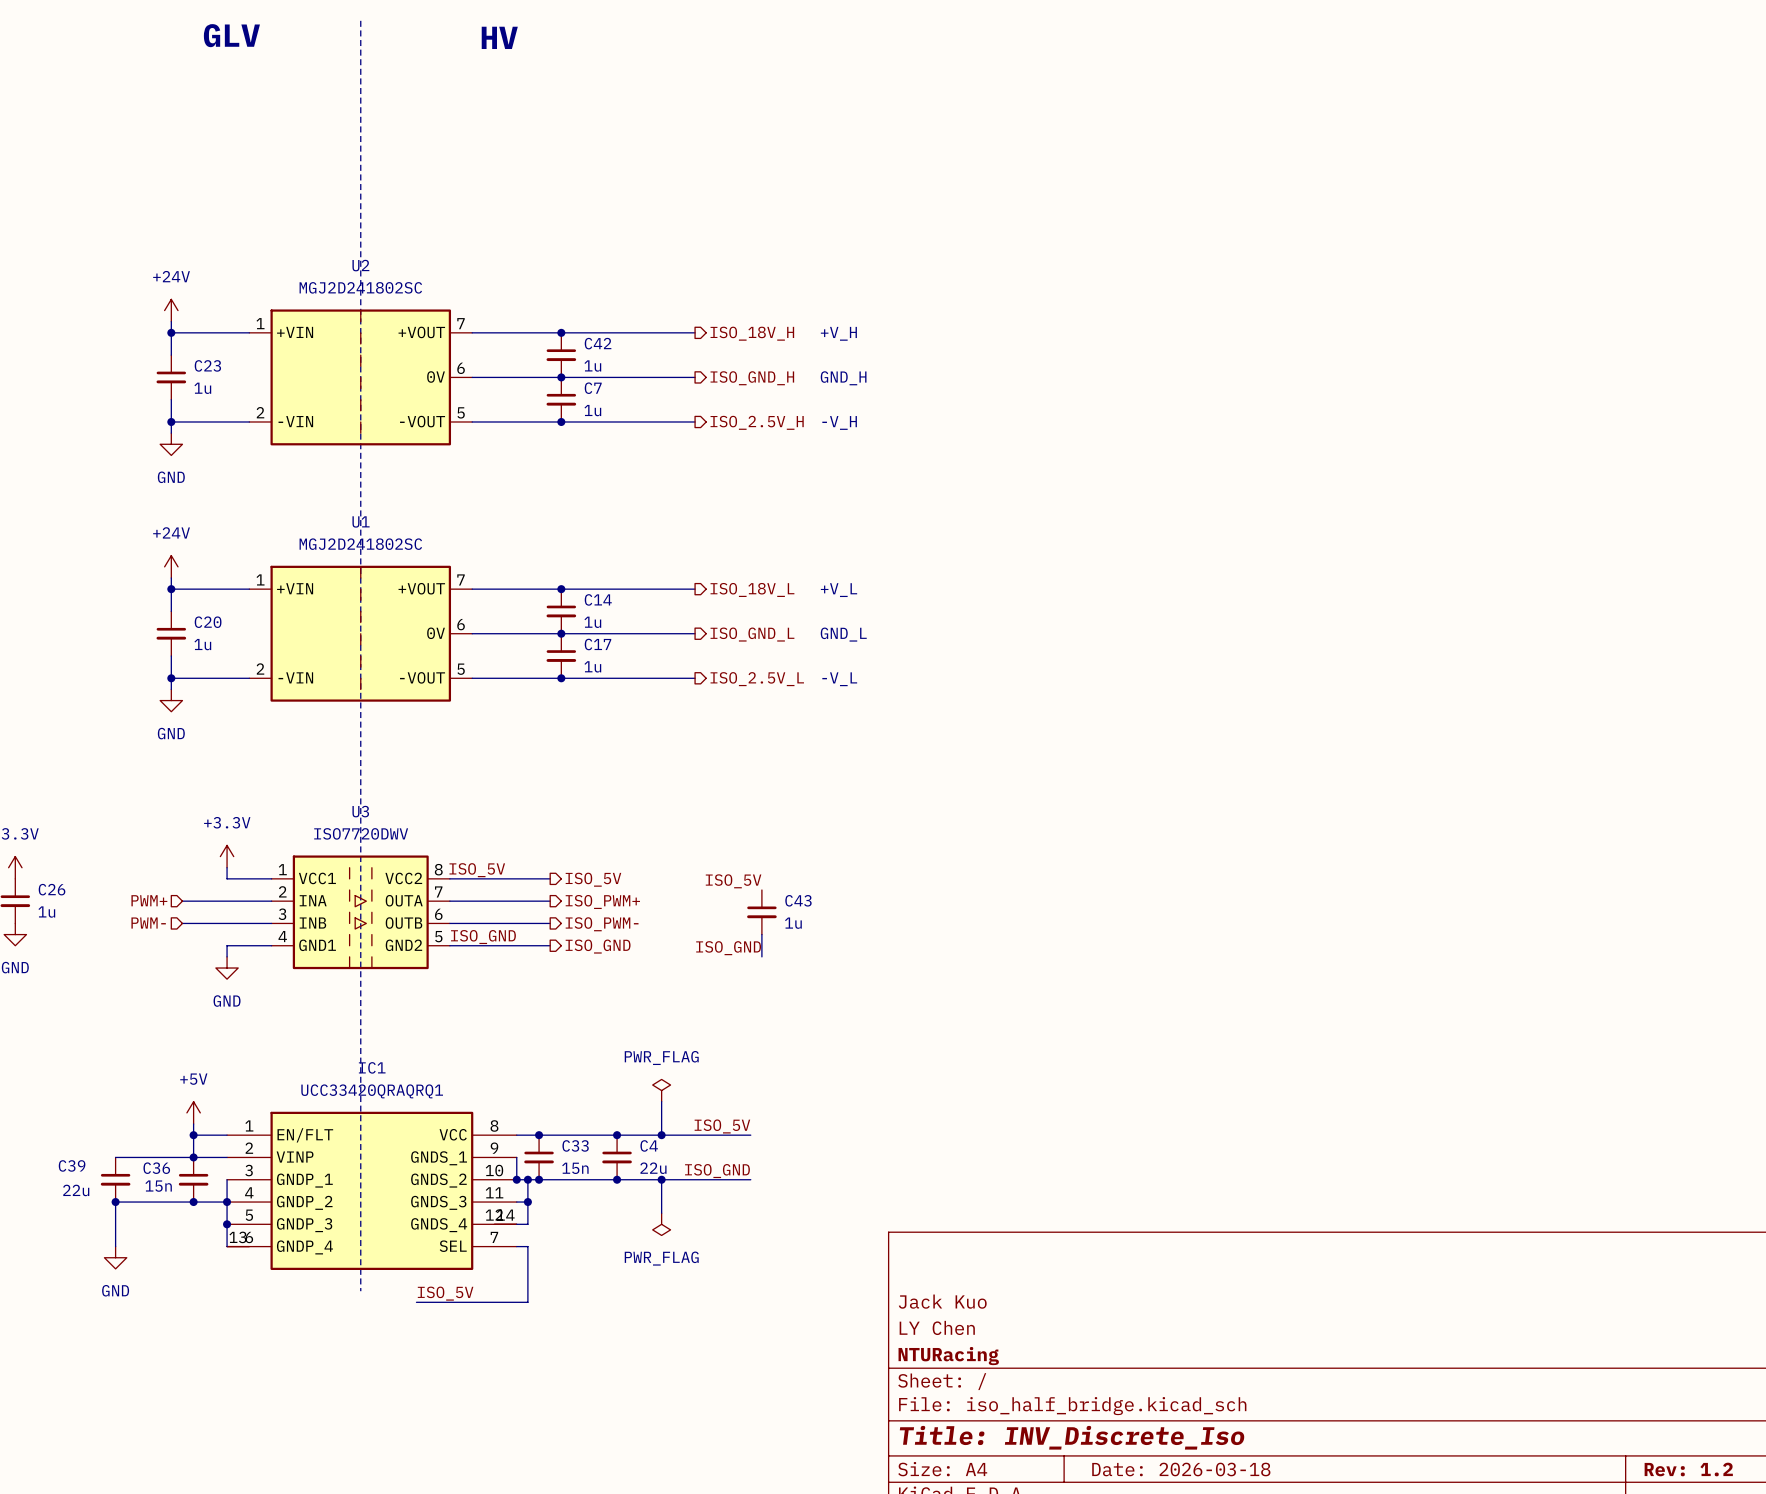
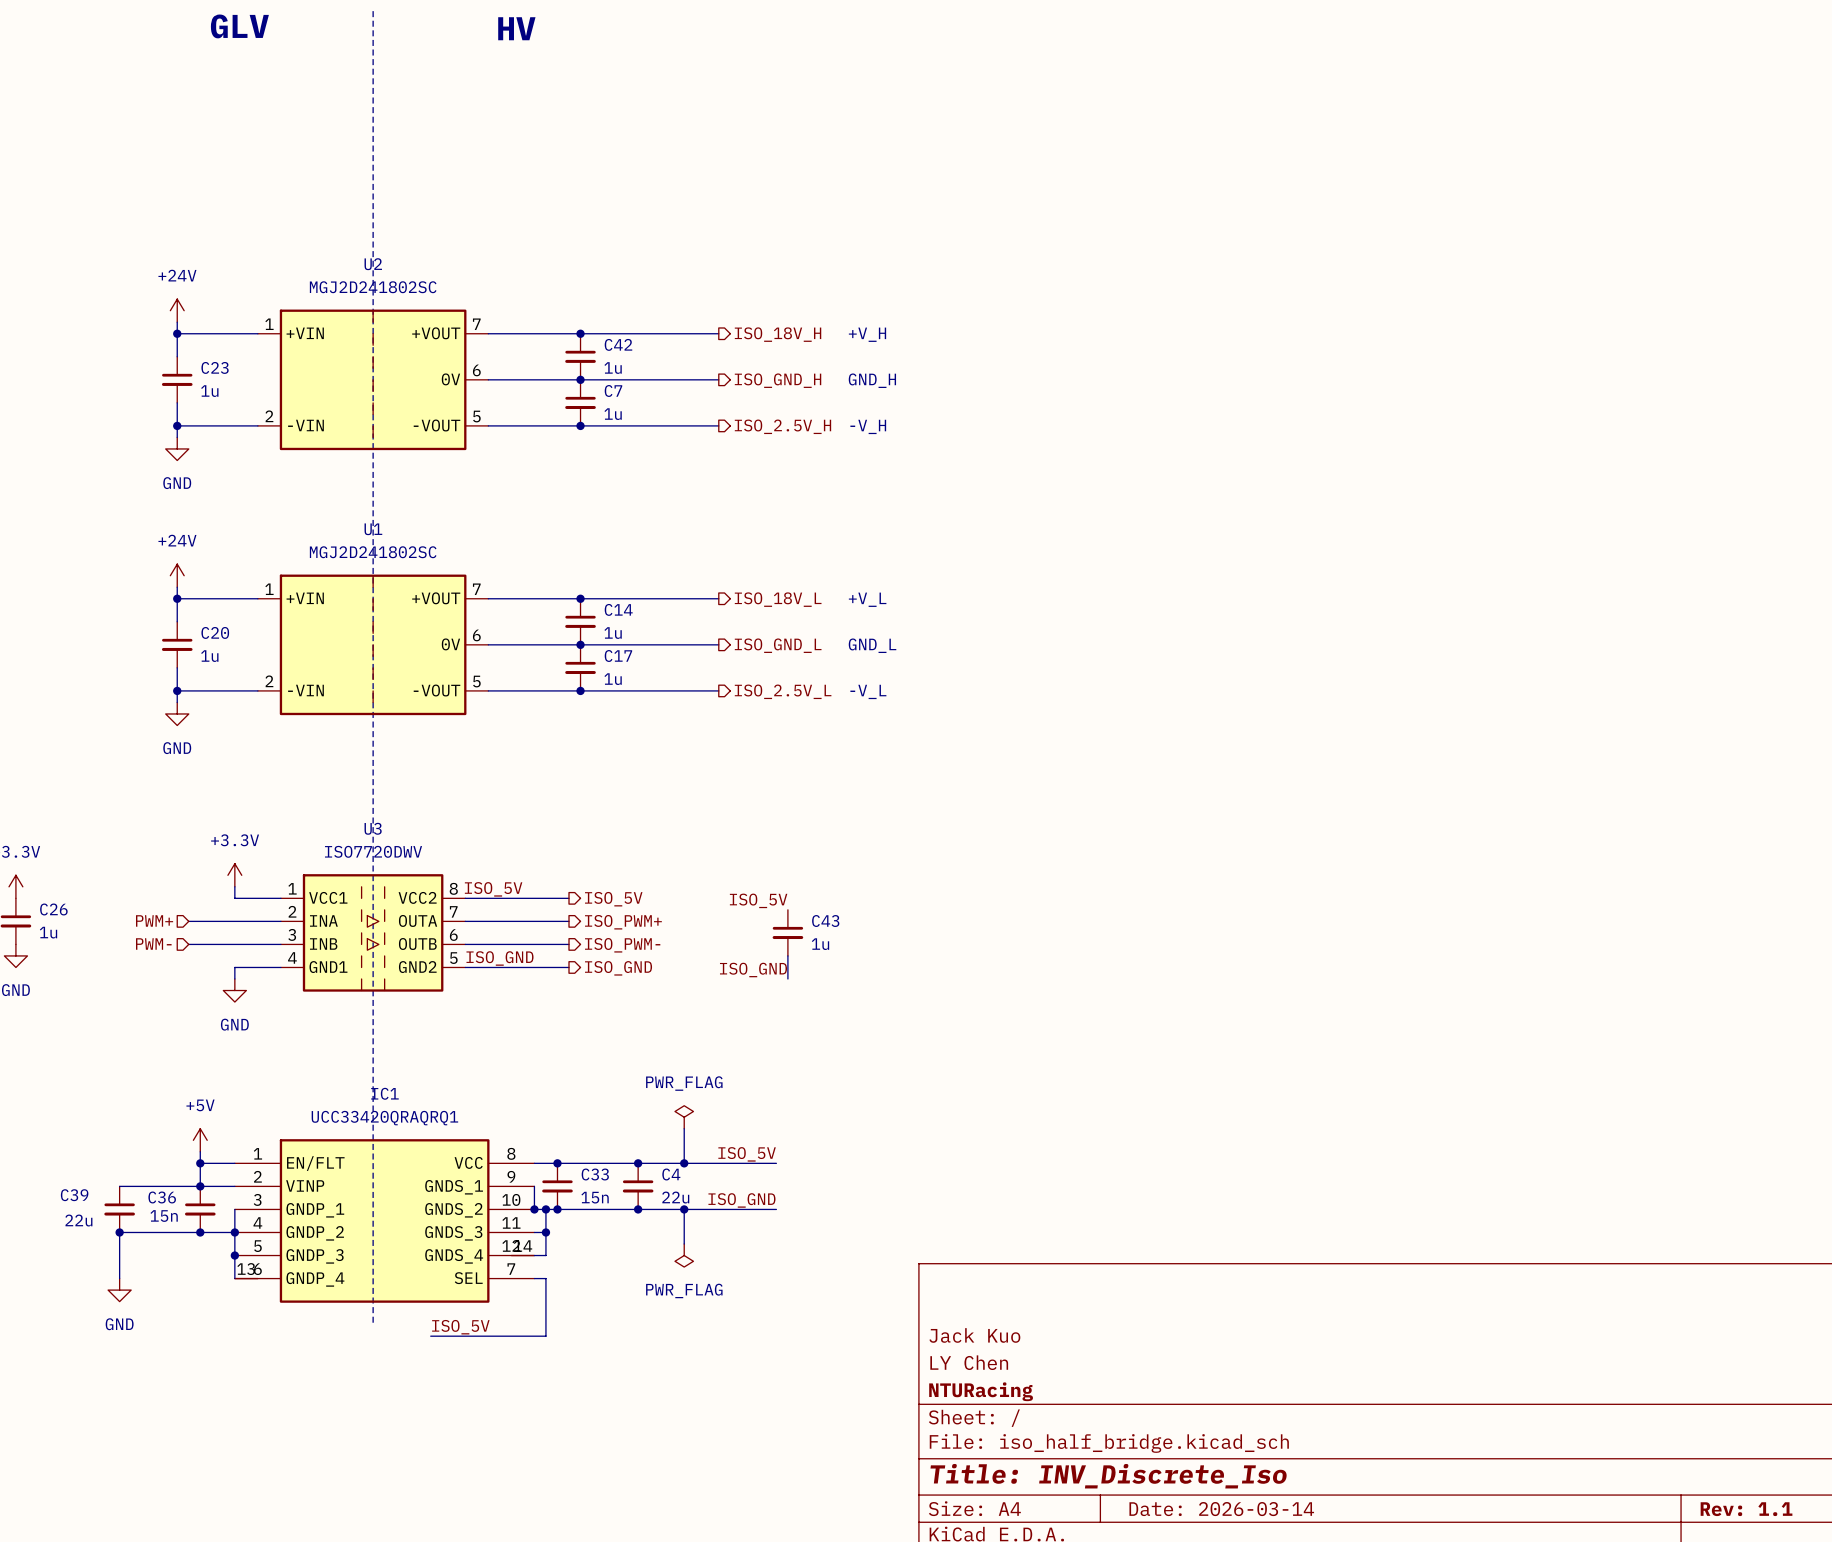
title block: Date: 2026-03-18 (1181, 1469) -> Date: 2026-03-14 (1221, 1509)
title block: Rev: 1.2 (1688, 1469) -> Rev: 1.1 (1746, 1509)

